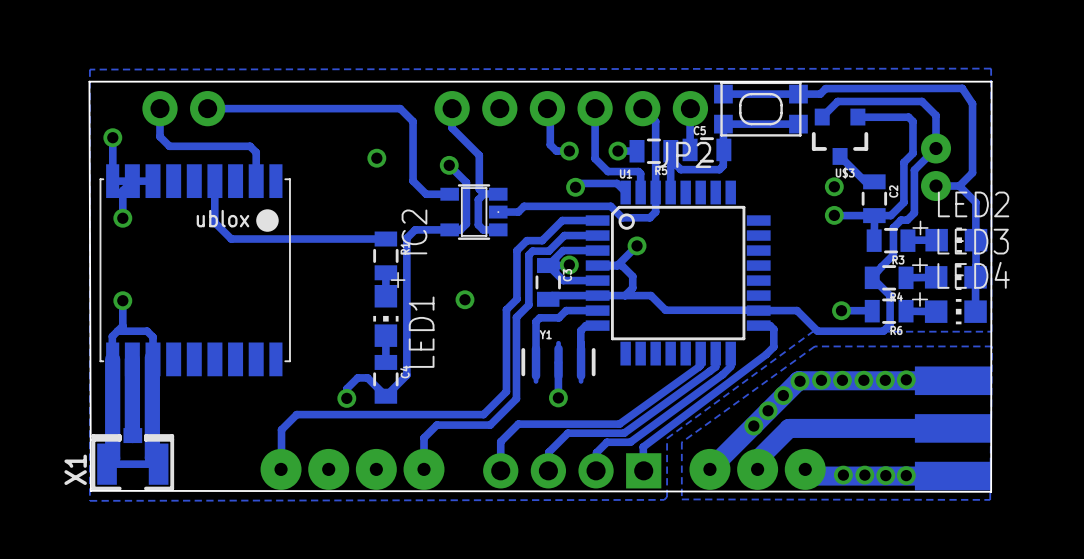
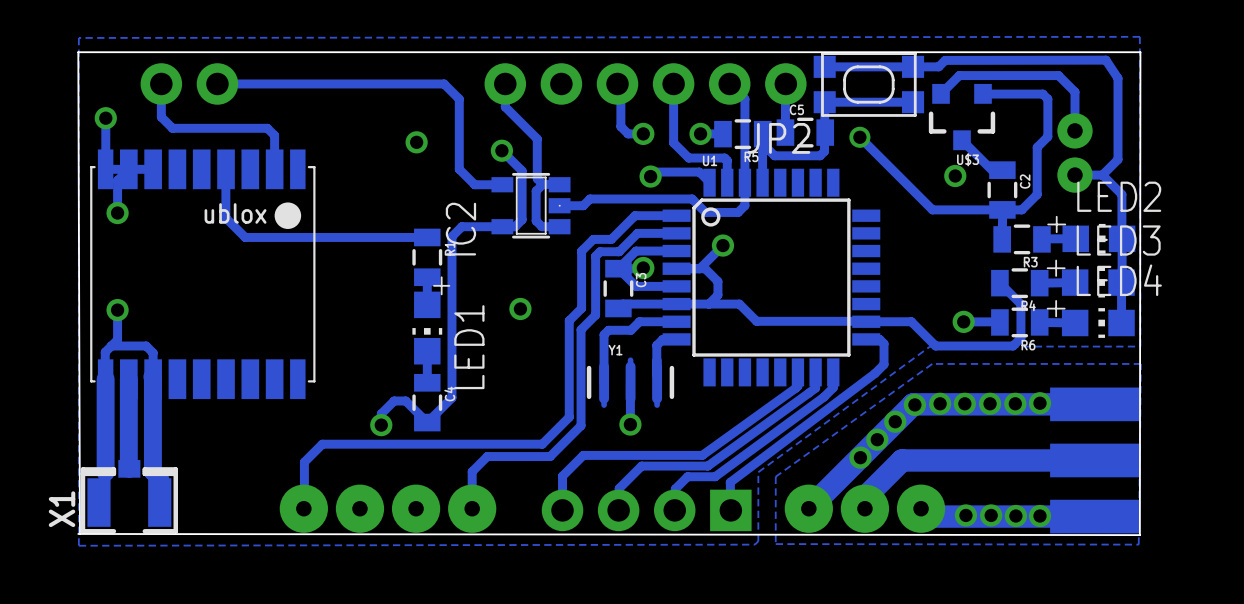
track: (936, 148) (914, 170) (914, 213) (907, 220) (901, 220) (893, 227) (893, 254) (872, 277) -> none
track: none -> (859, 137) (932, 209) (955, 209)
via: none -> (859, 137)
via: (834, 215) -> none
track: (152, 357) (152, 457) (158, 464) (107, 464) (112, 458) (112, 438) -> (152, 376) (152, 471) (159, 478) (159, 502)

